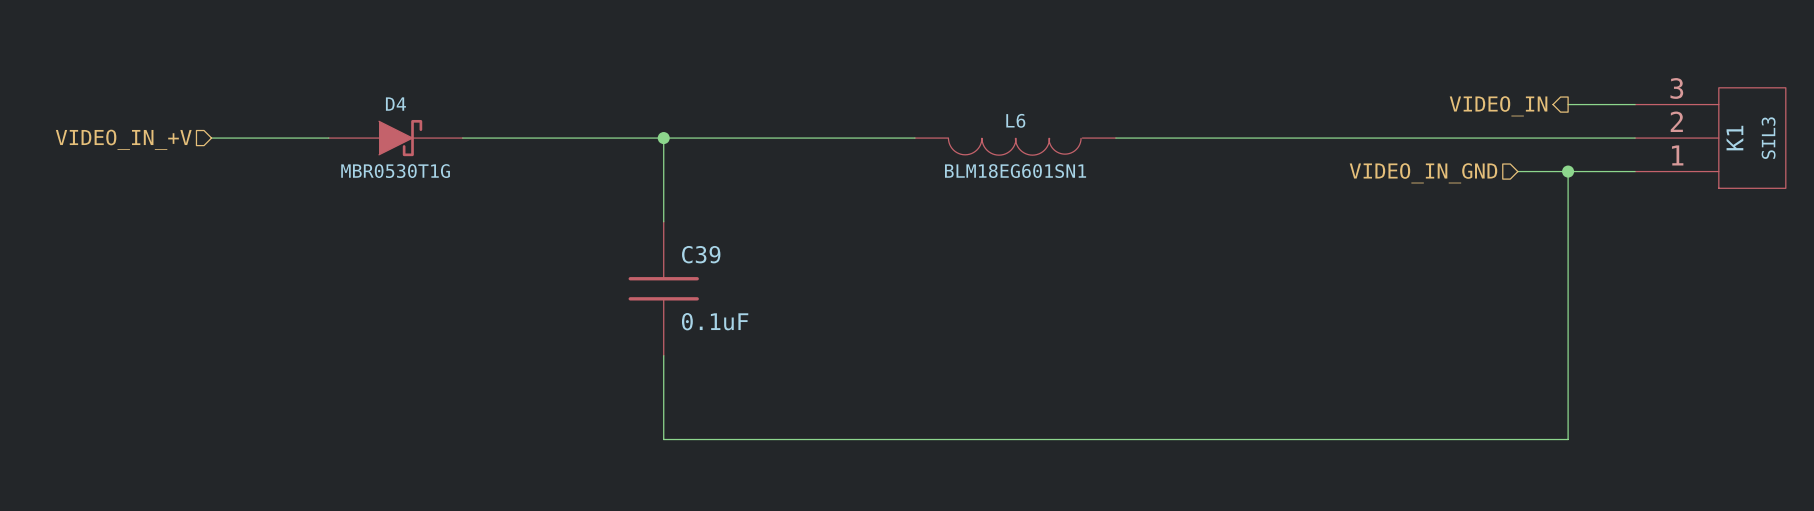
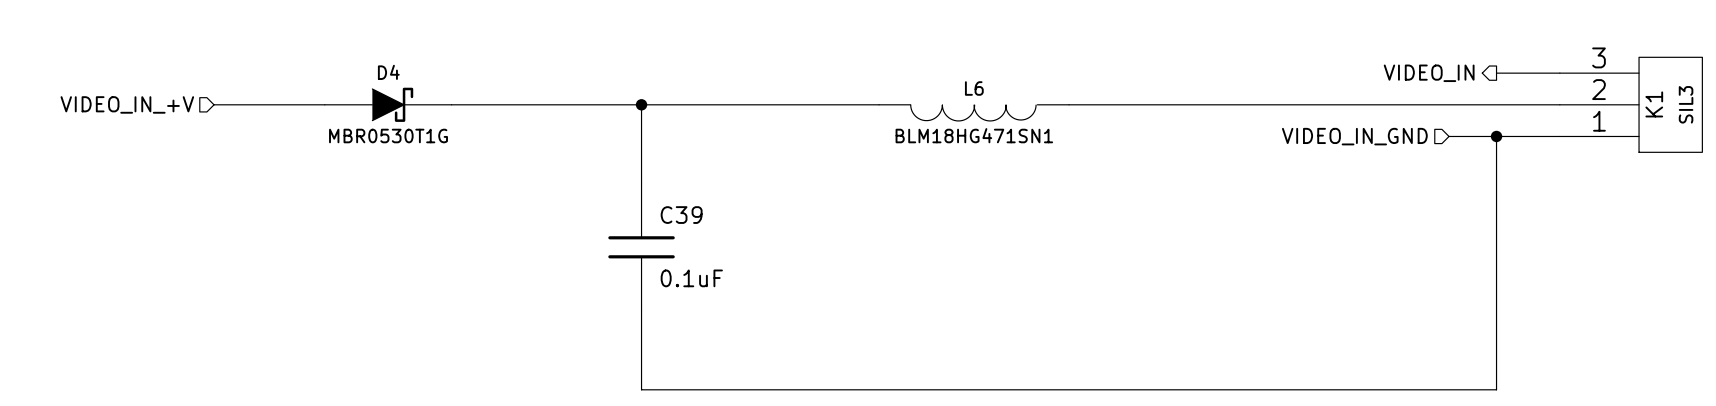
L6 value: BLM18EG601SN1 (1015, 171) -> BLM18HG471SN1 (974, 135)

